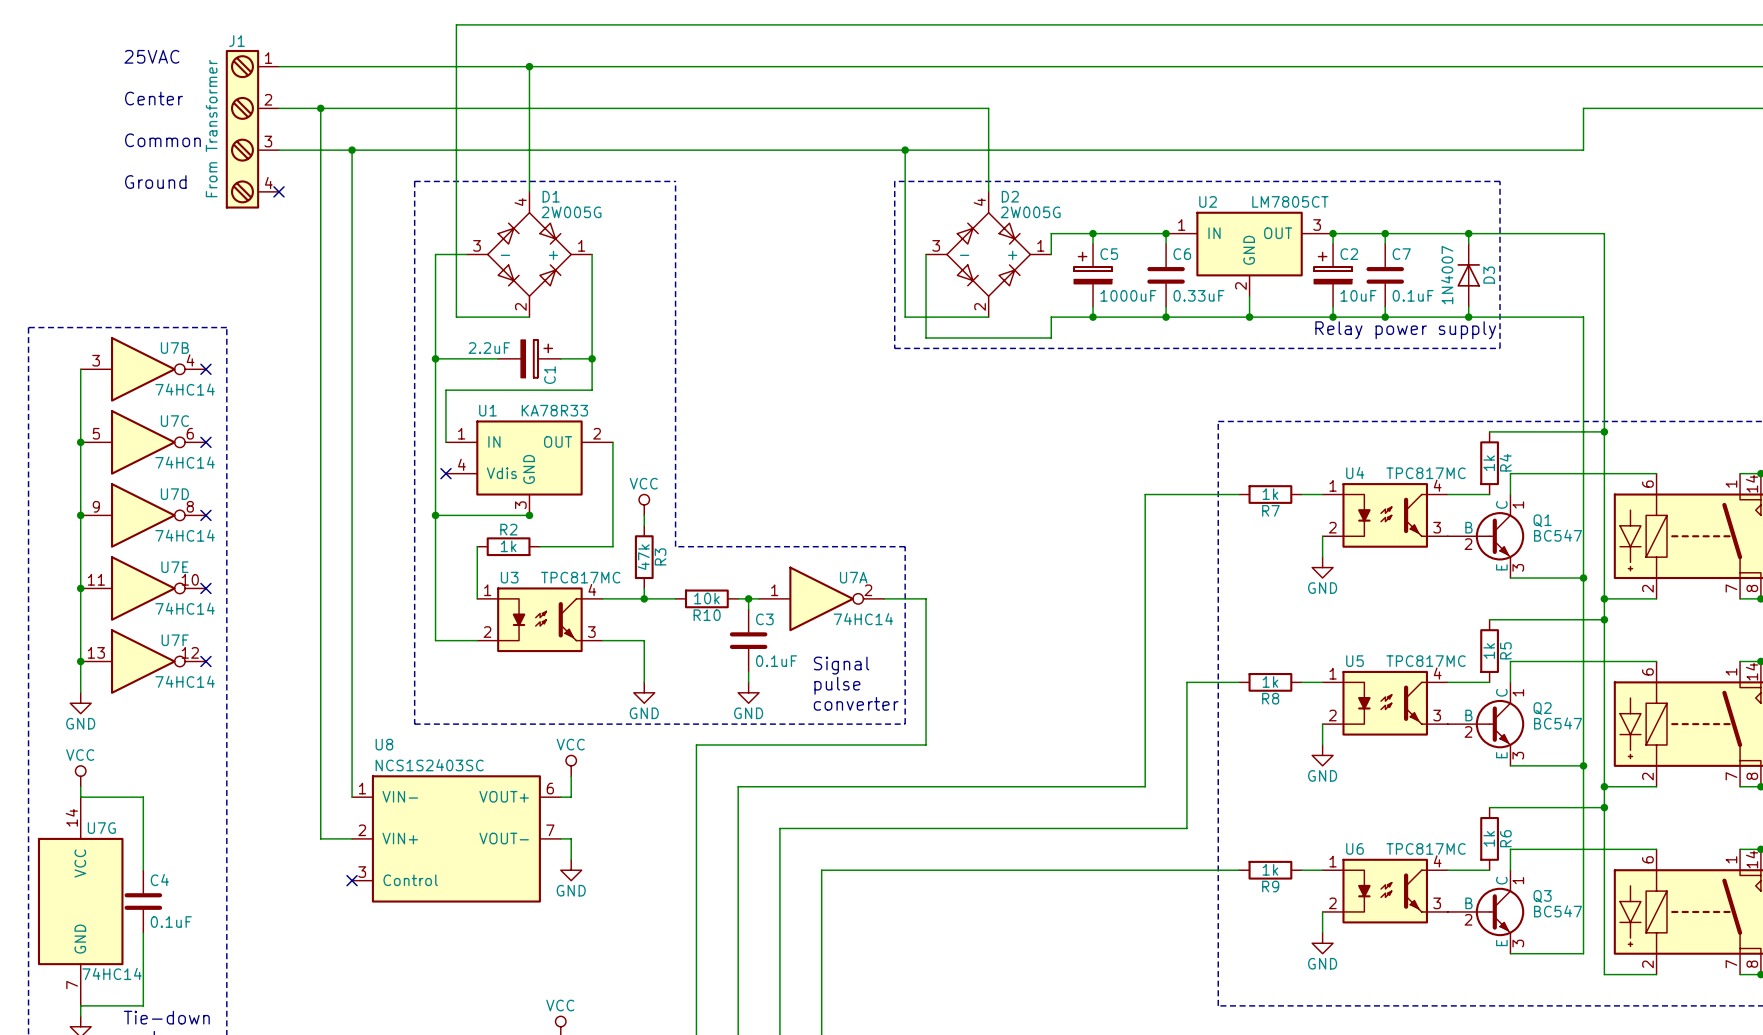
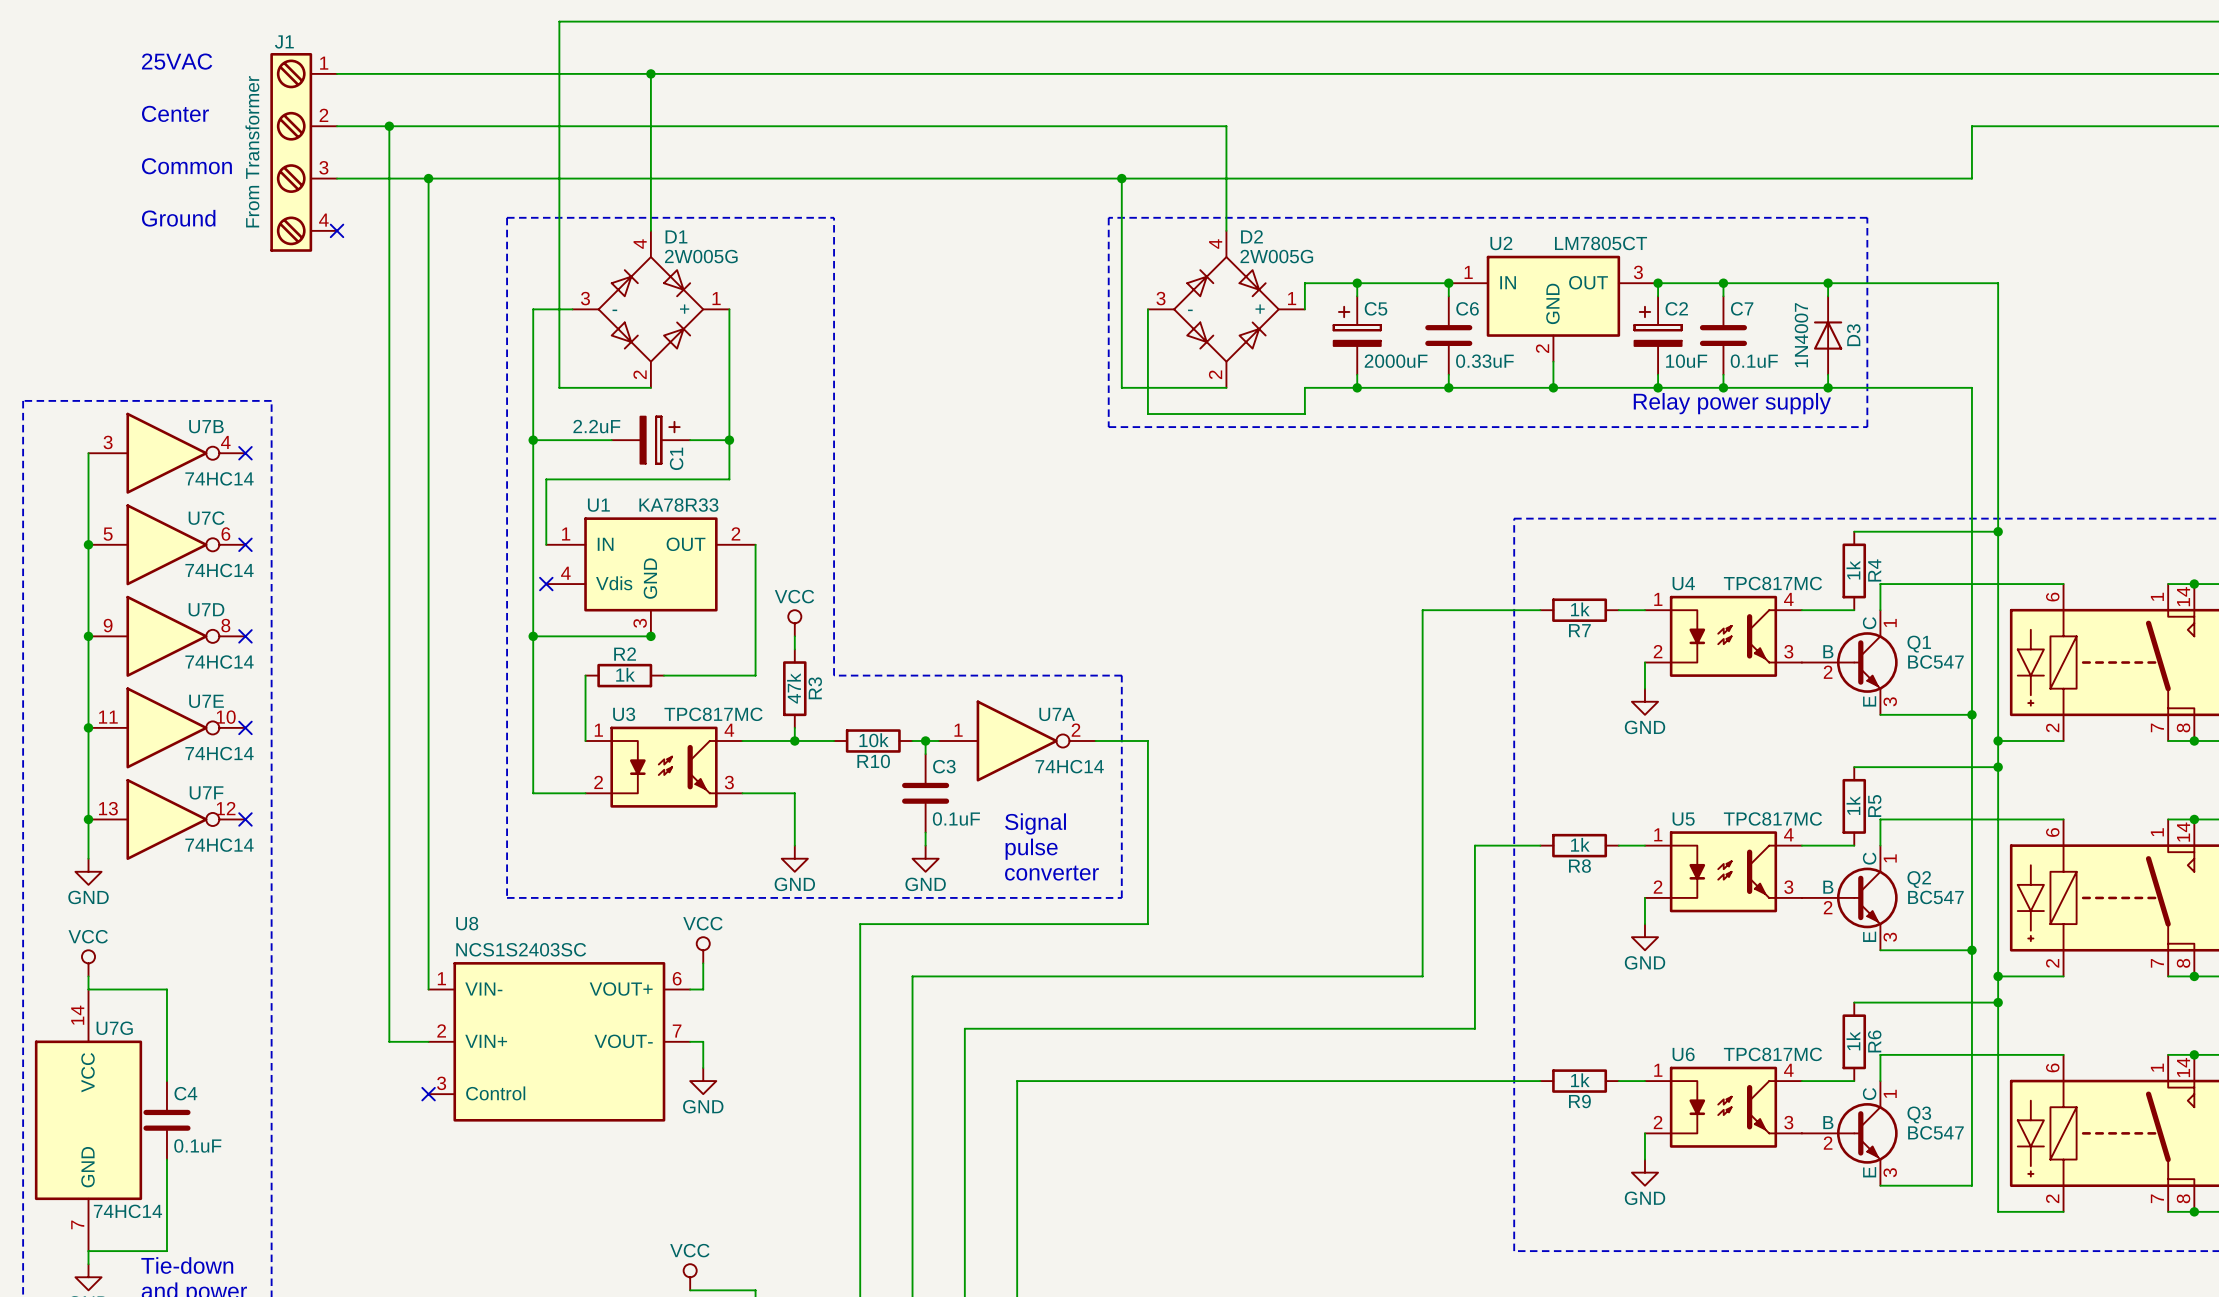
C5 value: 1000uF (1128, 295) -> 2000uF (1396, 361)

